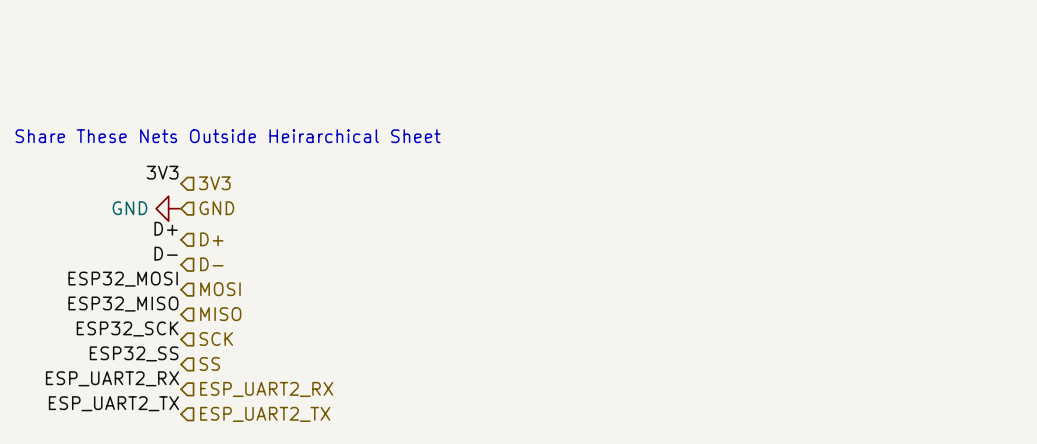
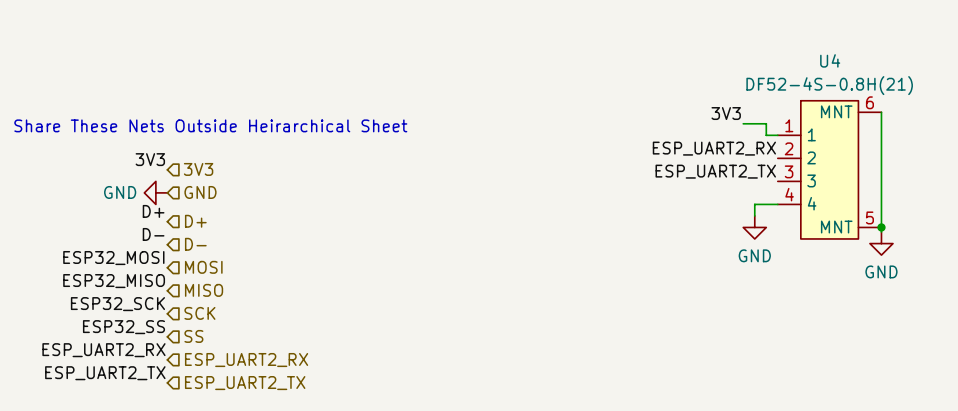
wire: none -> (881, 112) (881, 232)
label: none -> 3V3 (726, 113)
wire: none -> (743, 123) (766, 123) (766, 135) (777, 135)
label: none -> ESP_UART2_RX (714, 148)
U4: none -> DF52-4S-0.8H(21) (829, 169)
label: none -> ESP_UART2_TX (715, 171)
wire: none -> (777, 204) (754, 204) (754, 215)
power symbol: none -> GND (754, 227)
junction: none -> (881, 227)
power symbol: none -> GND (881, 243)

